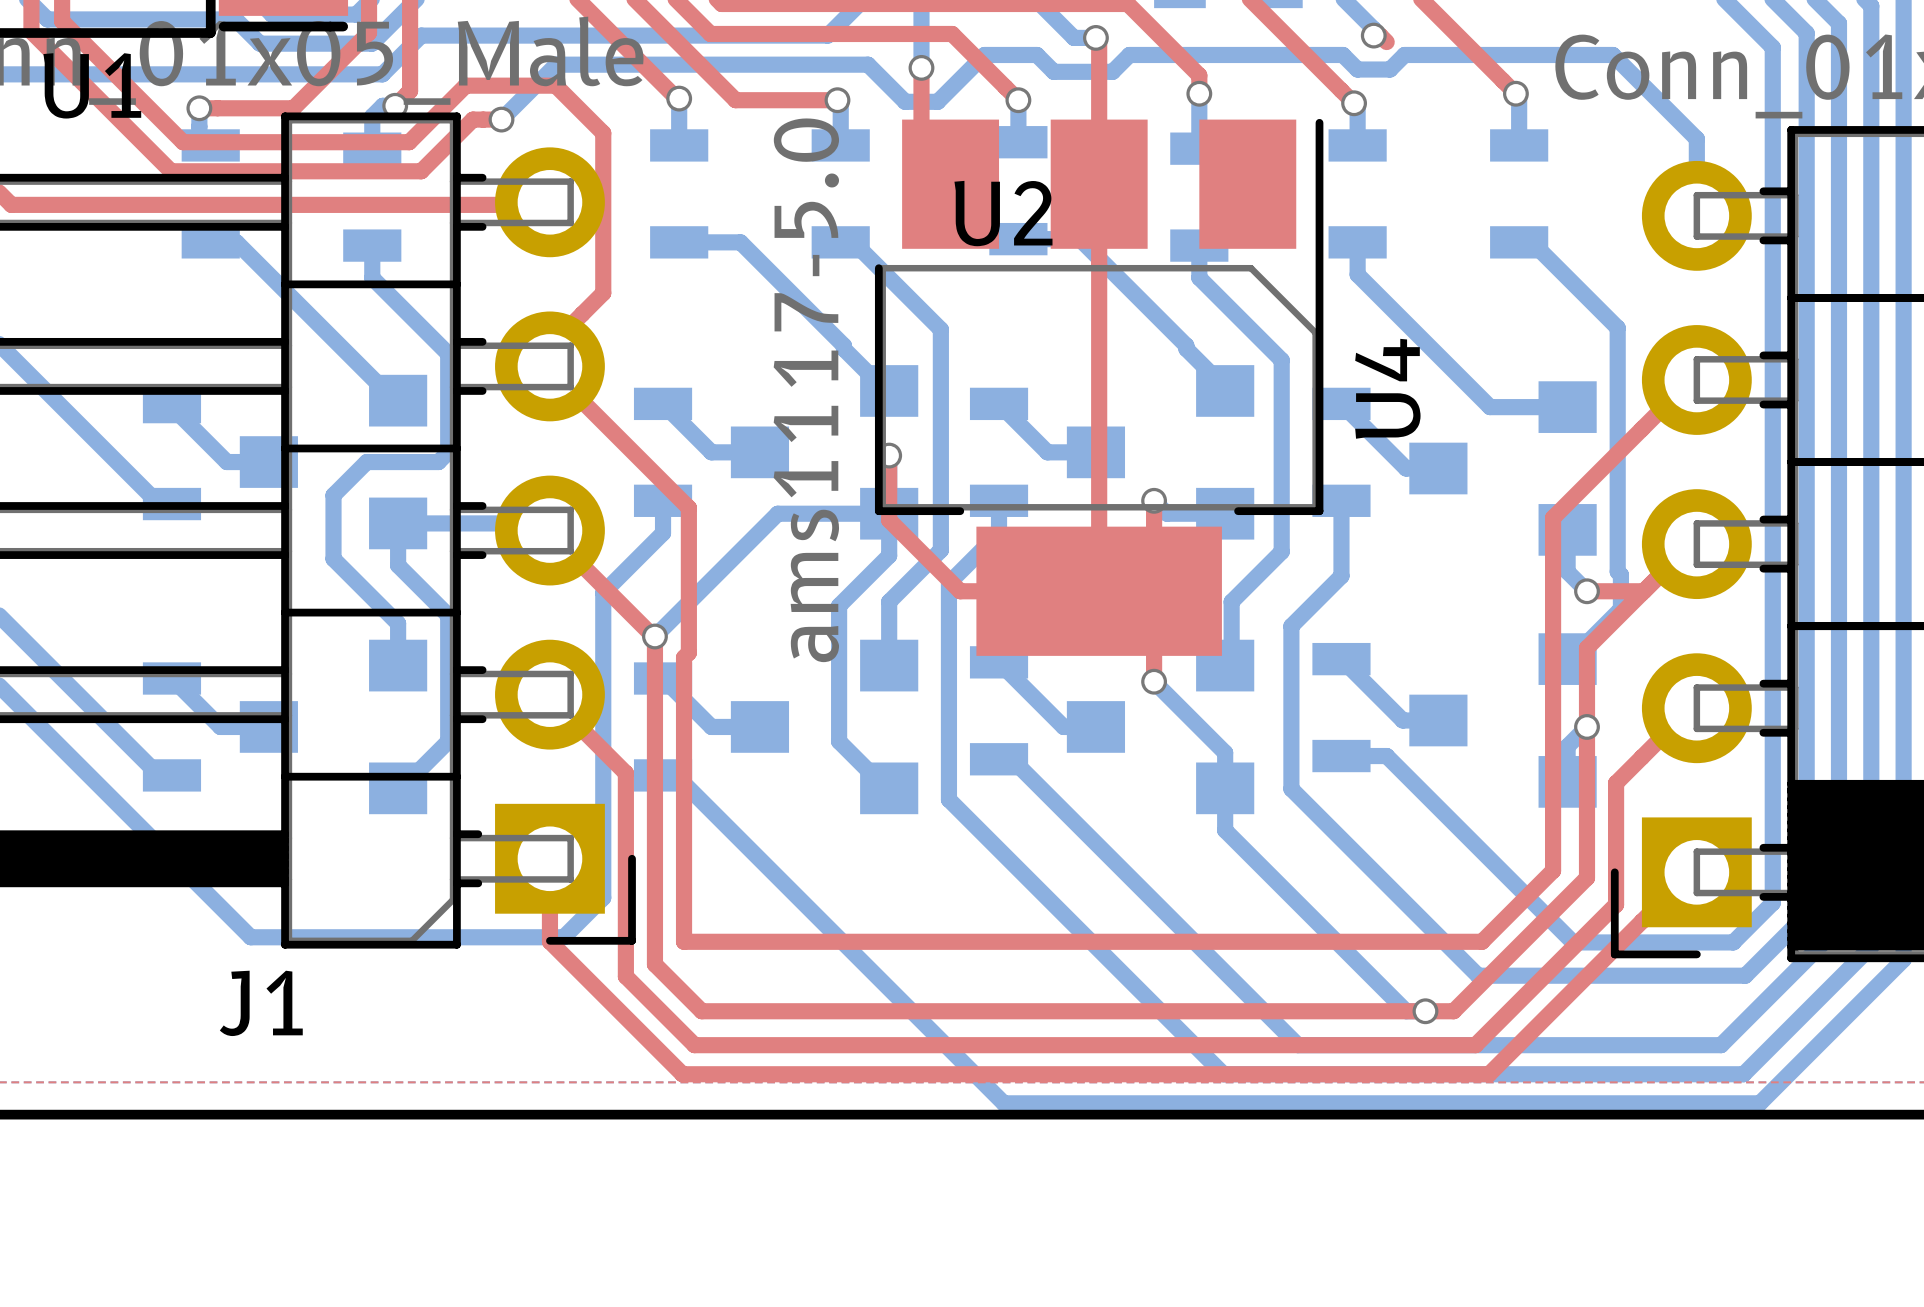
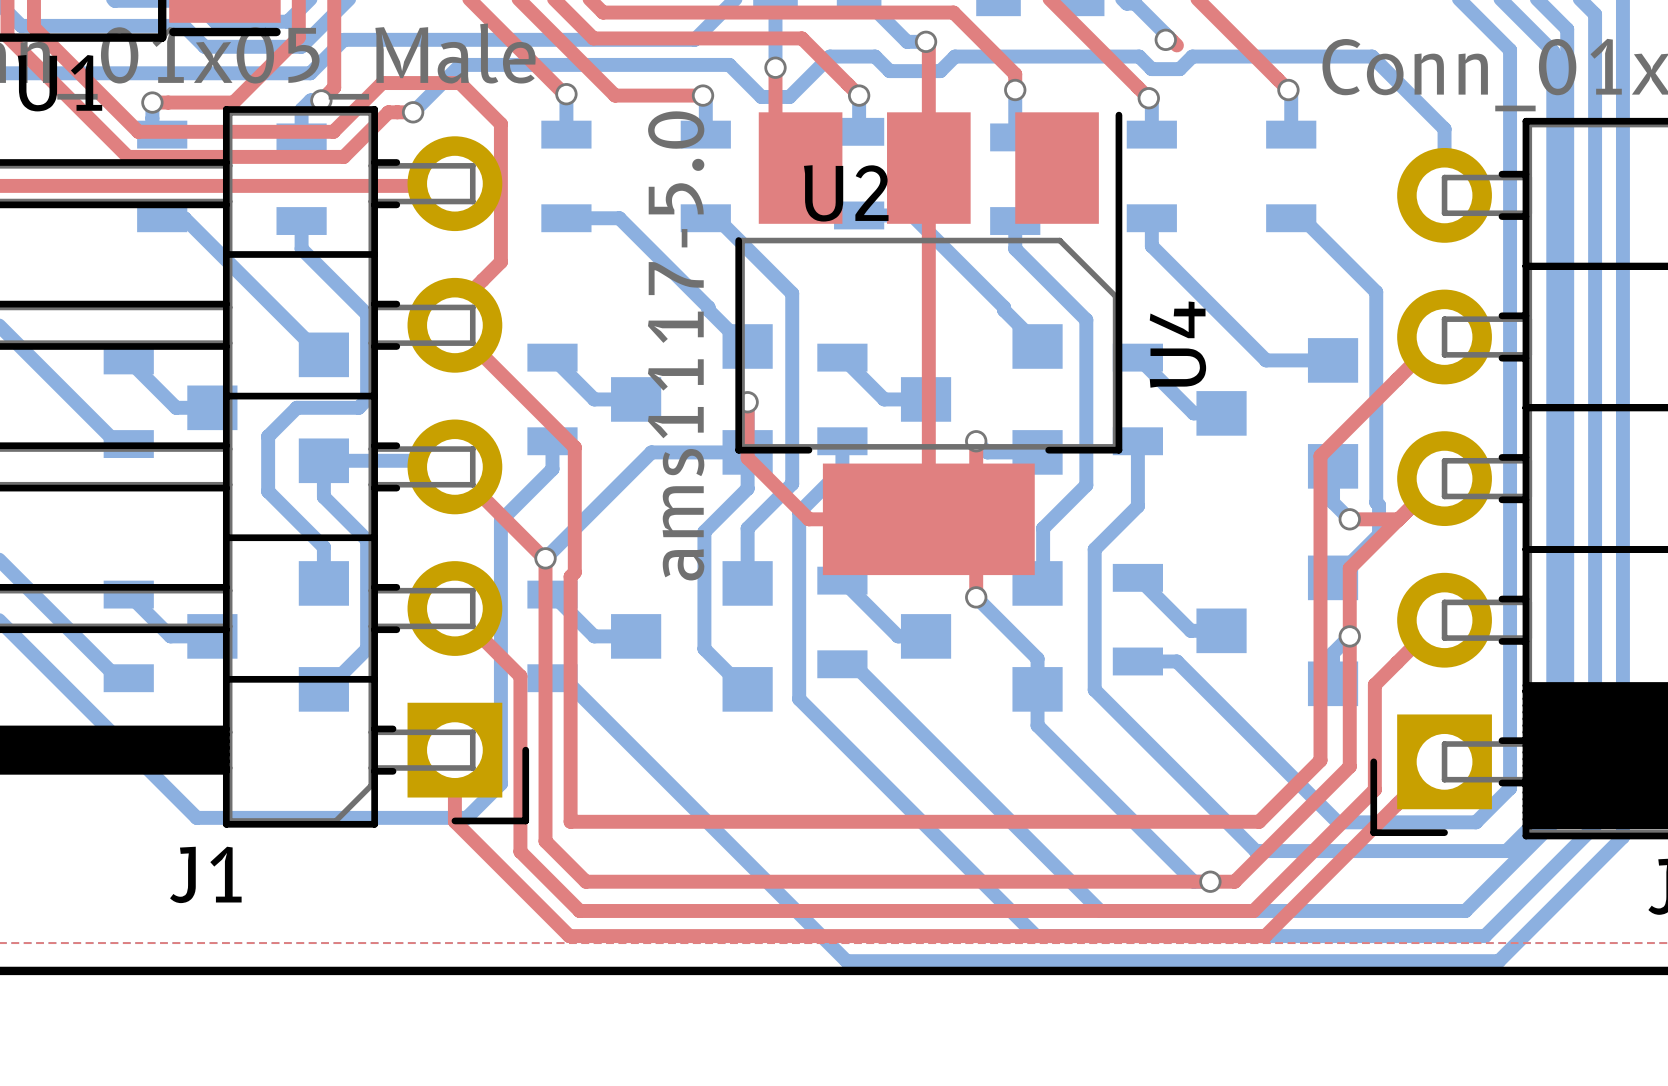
bottom track: (1806, 33) (1806, 914) (1745, 975) -> (1539, 37) (1553, 51) (1553, 804) (1506, 851) (1486, 851)

